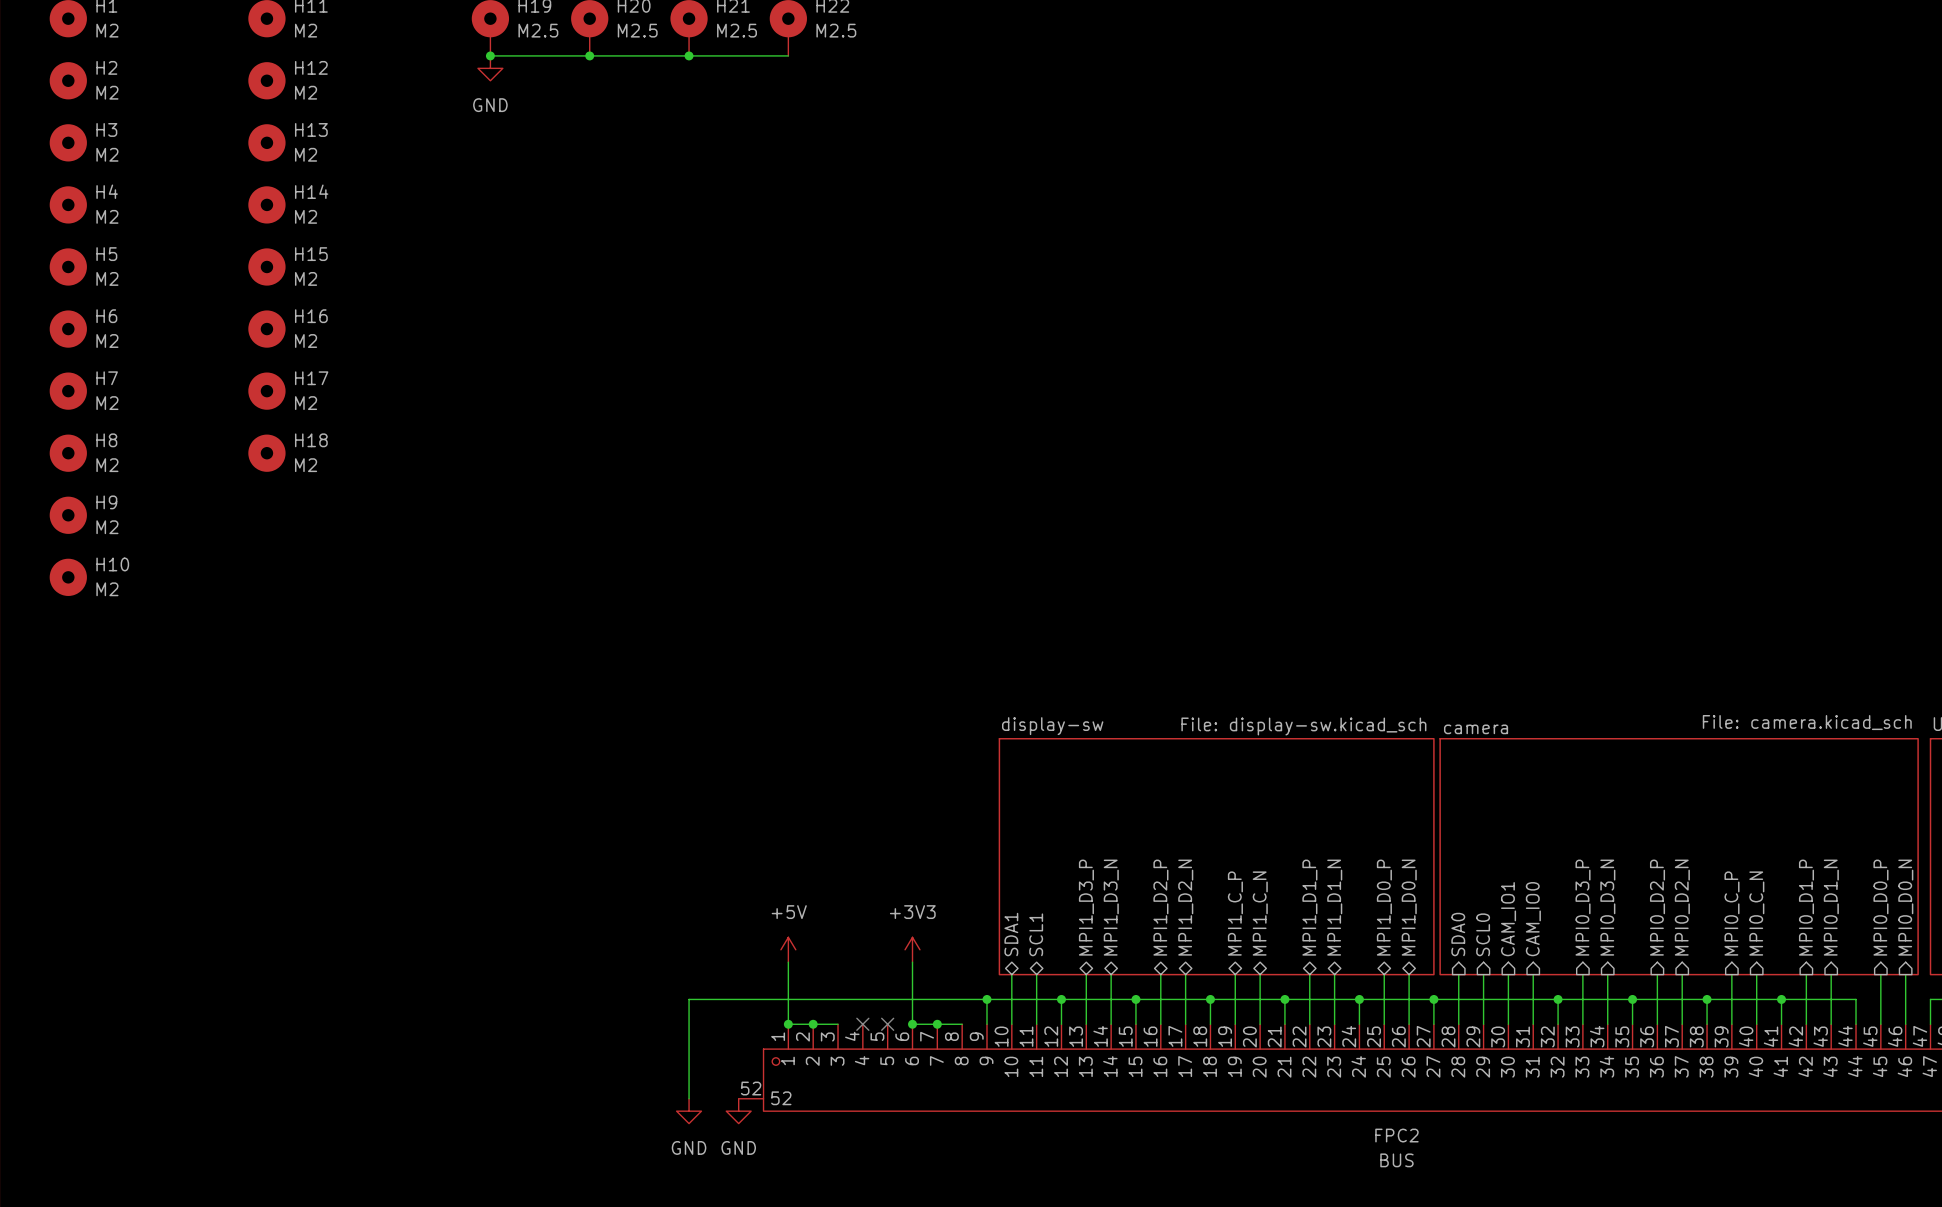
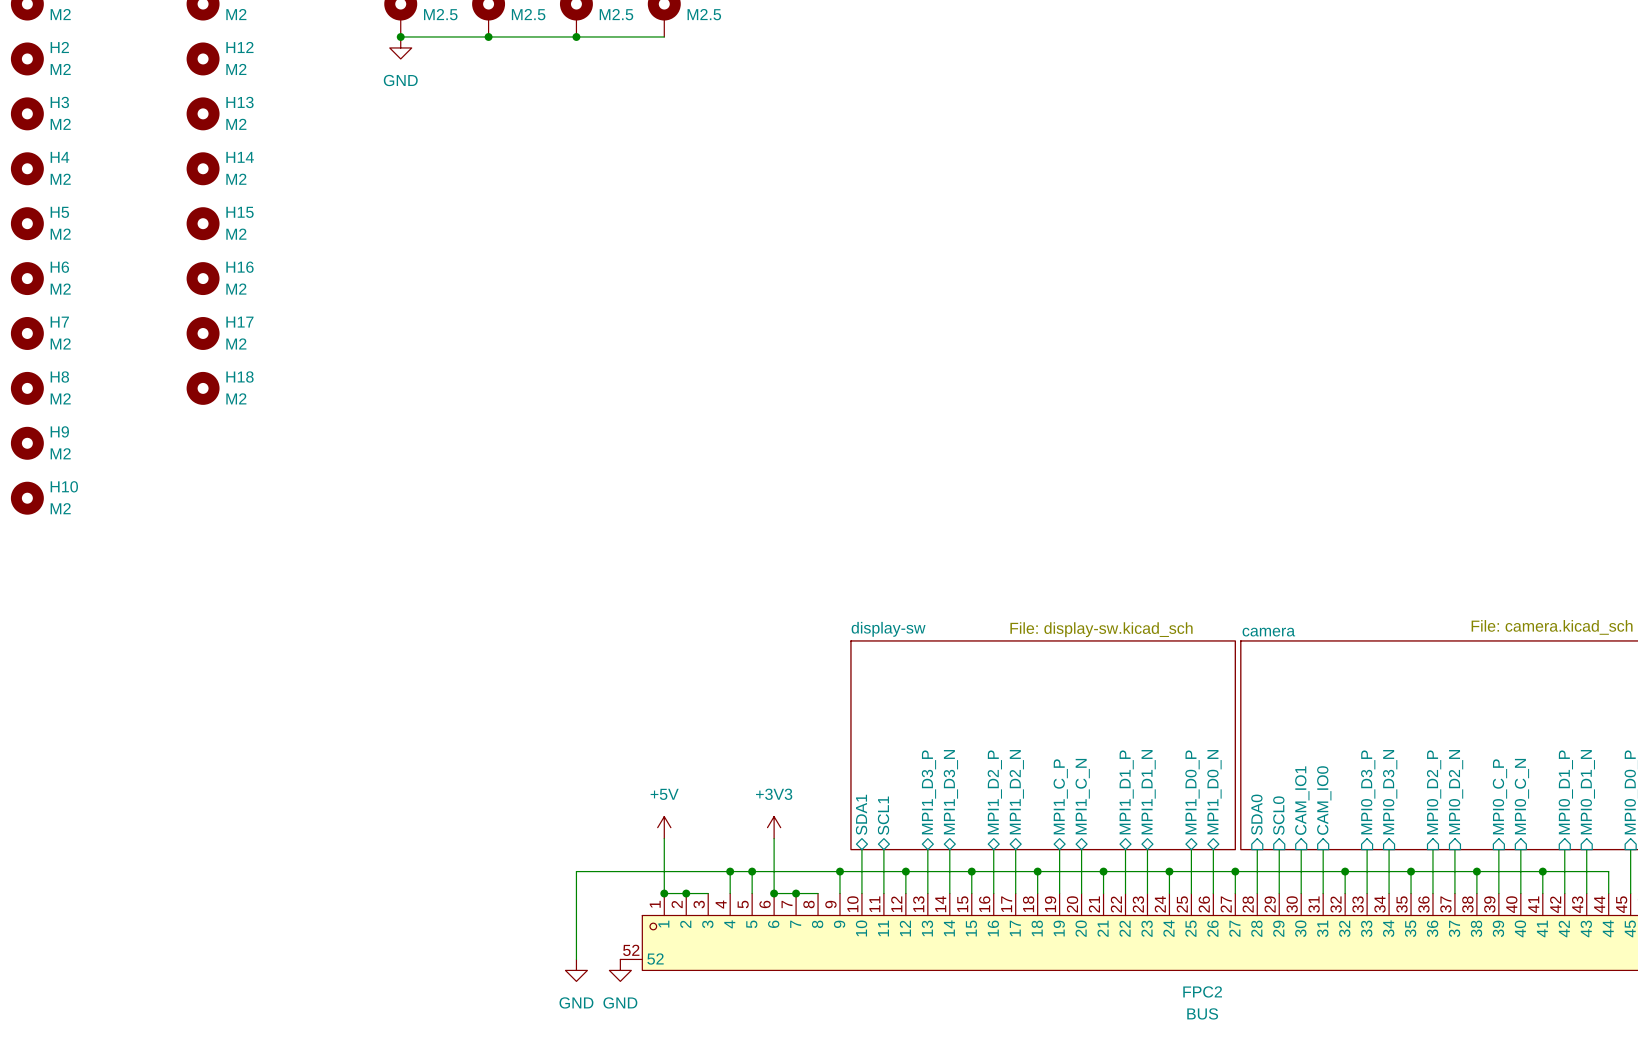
wire: none -> (730, 871) (730, 893)
junction: none -> (730, 871)
wire: none -> (752, 871) (752, 893)
junction: none -> (752, 871)
no-connect mark: (862, 1024) -> none
no-connect mark: (887, 1024) -> none

